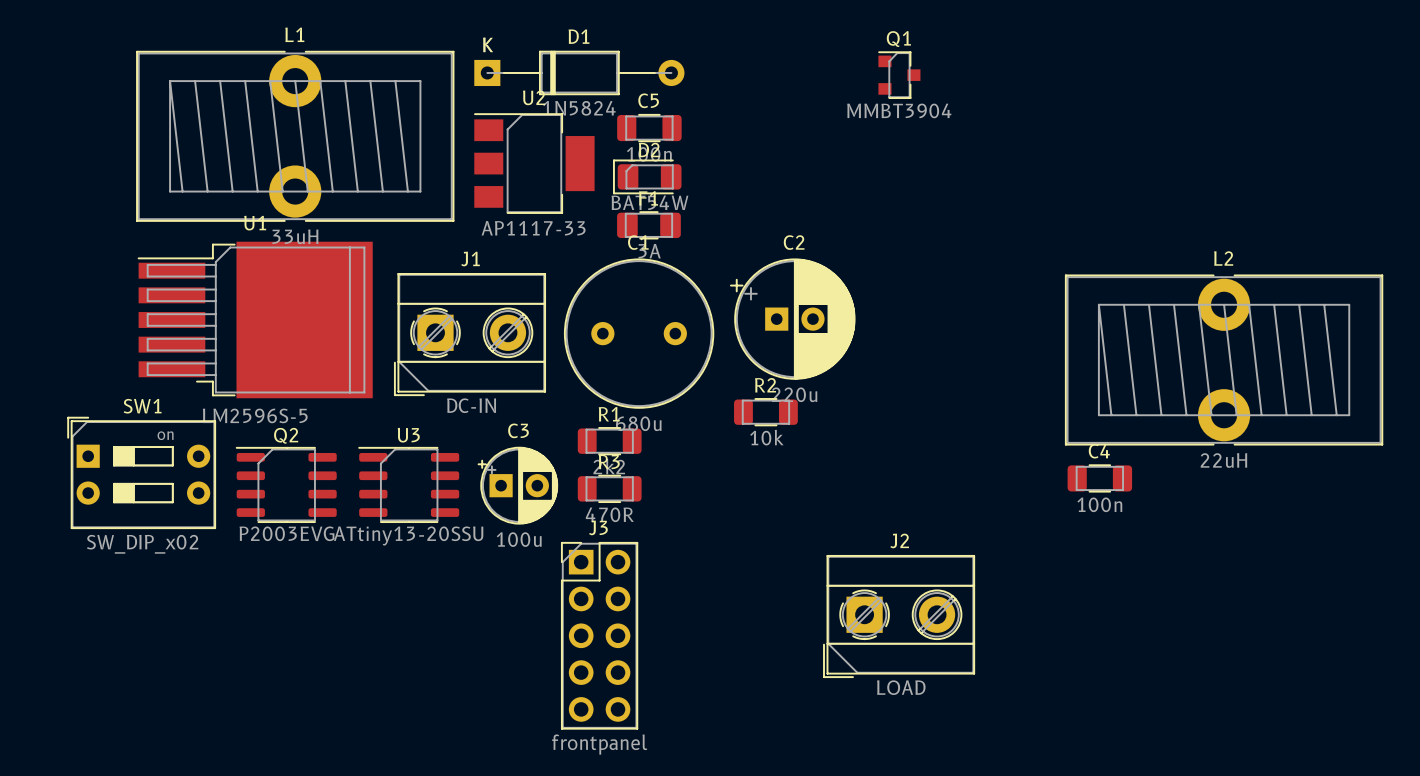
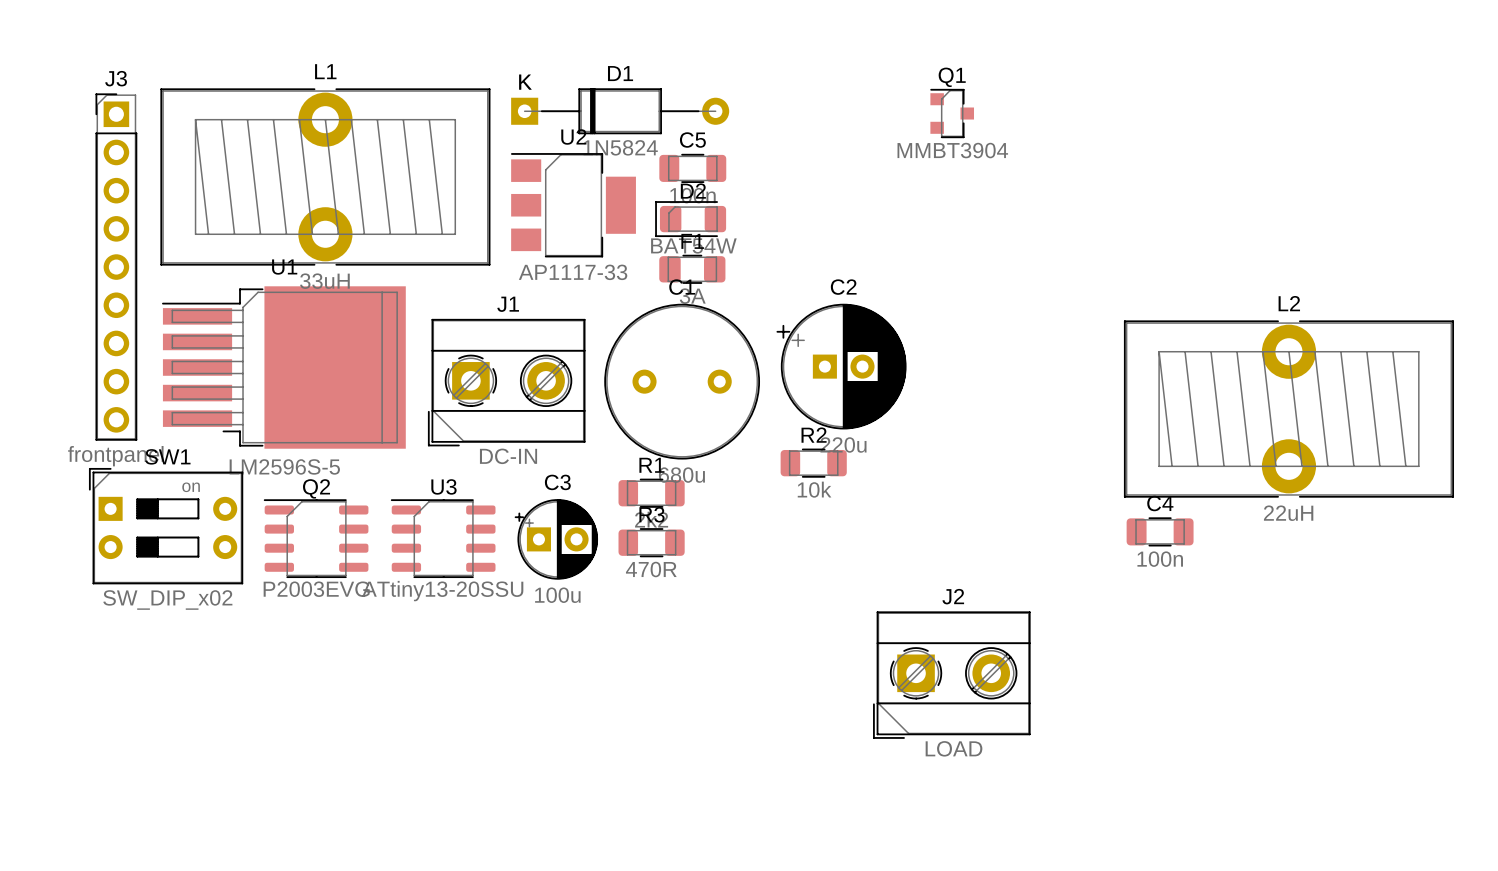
J3 name position: J3 (598, 527) -> J3 (116, 78)
J3 footprint: [561, 541, 639, 730] -> [95, 93, 138, 441]
J3 value position: frontpanel (599, 744) -> frontpanel (115, 456)

